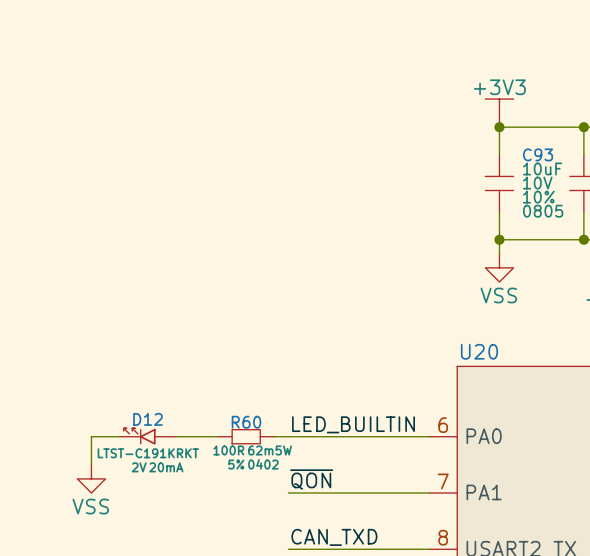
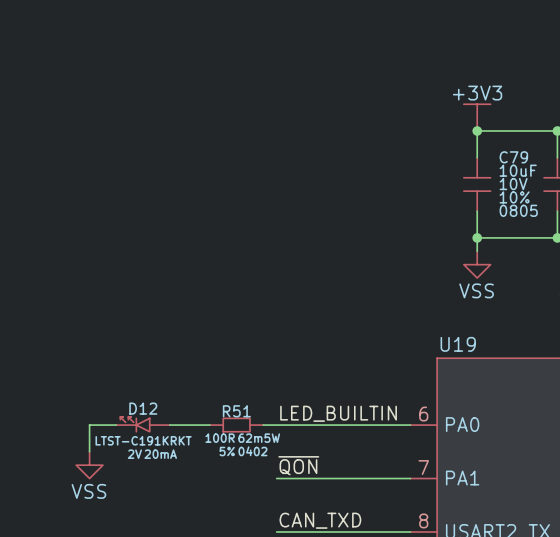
C93 name: C93 (538, 154) -> C79 (513, 157)
U20 name: U20 (479, 351) -> U19 (458, 344)
R60 name: R60 (246, 422) -> R51 (236, 411)

